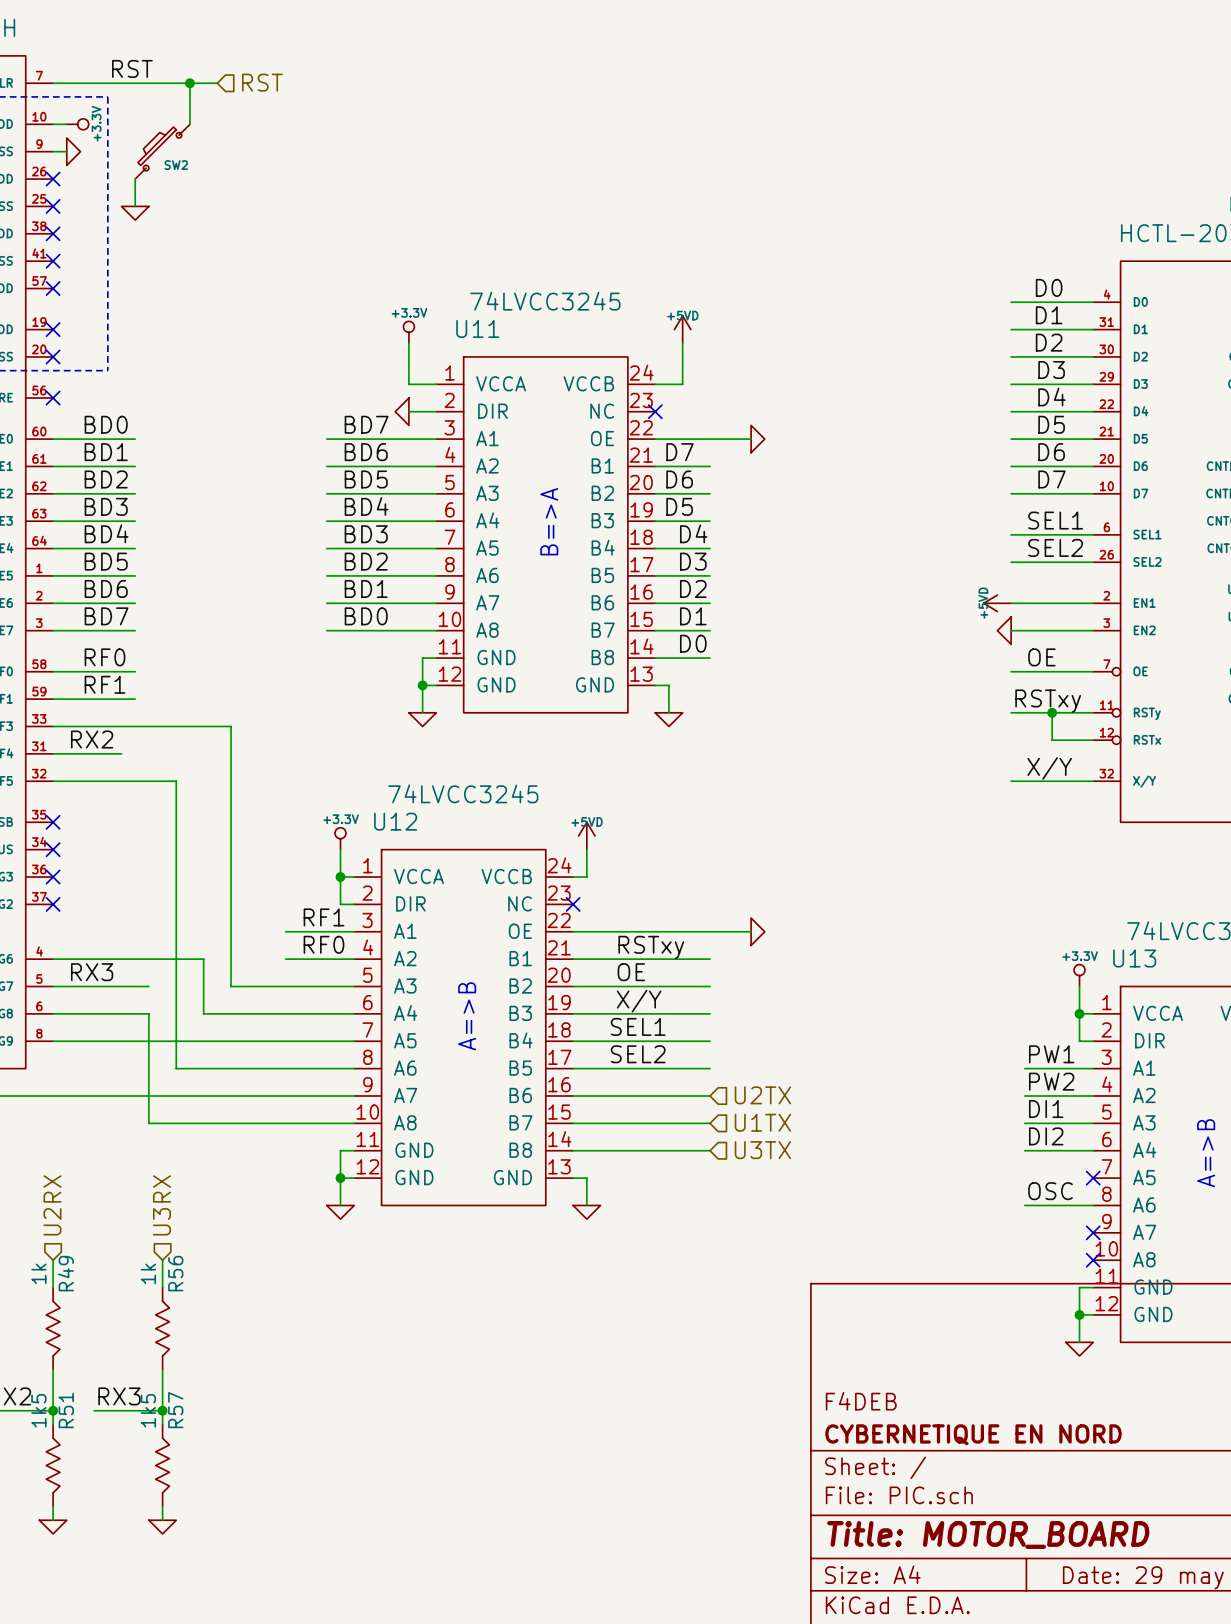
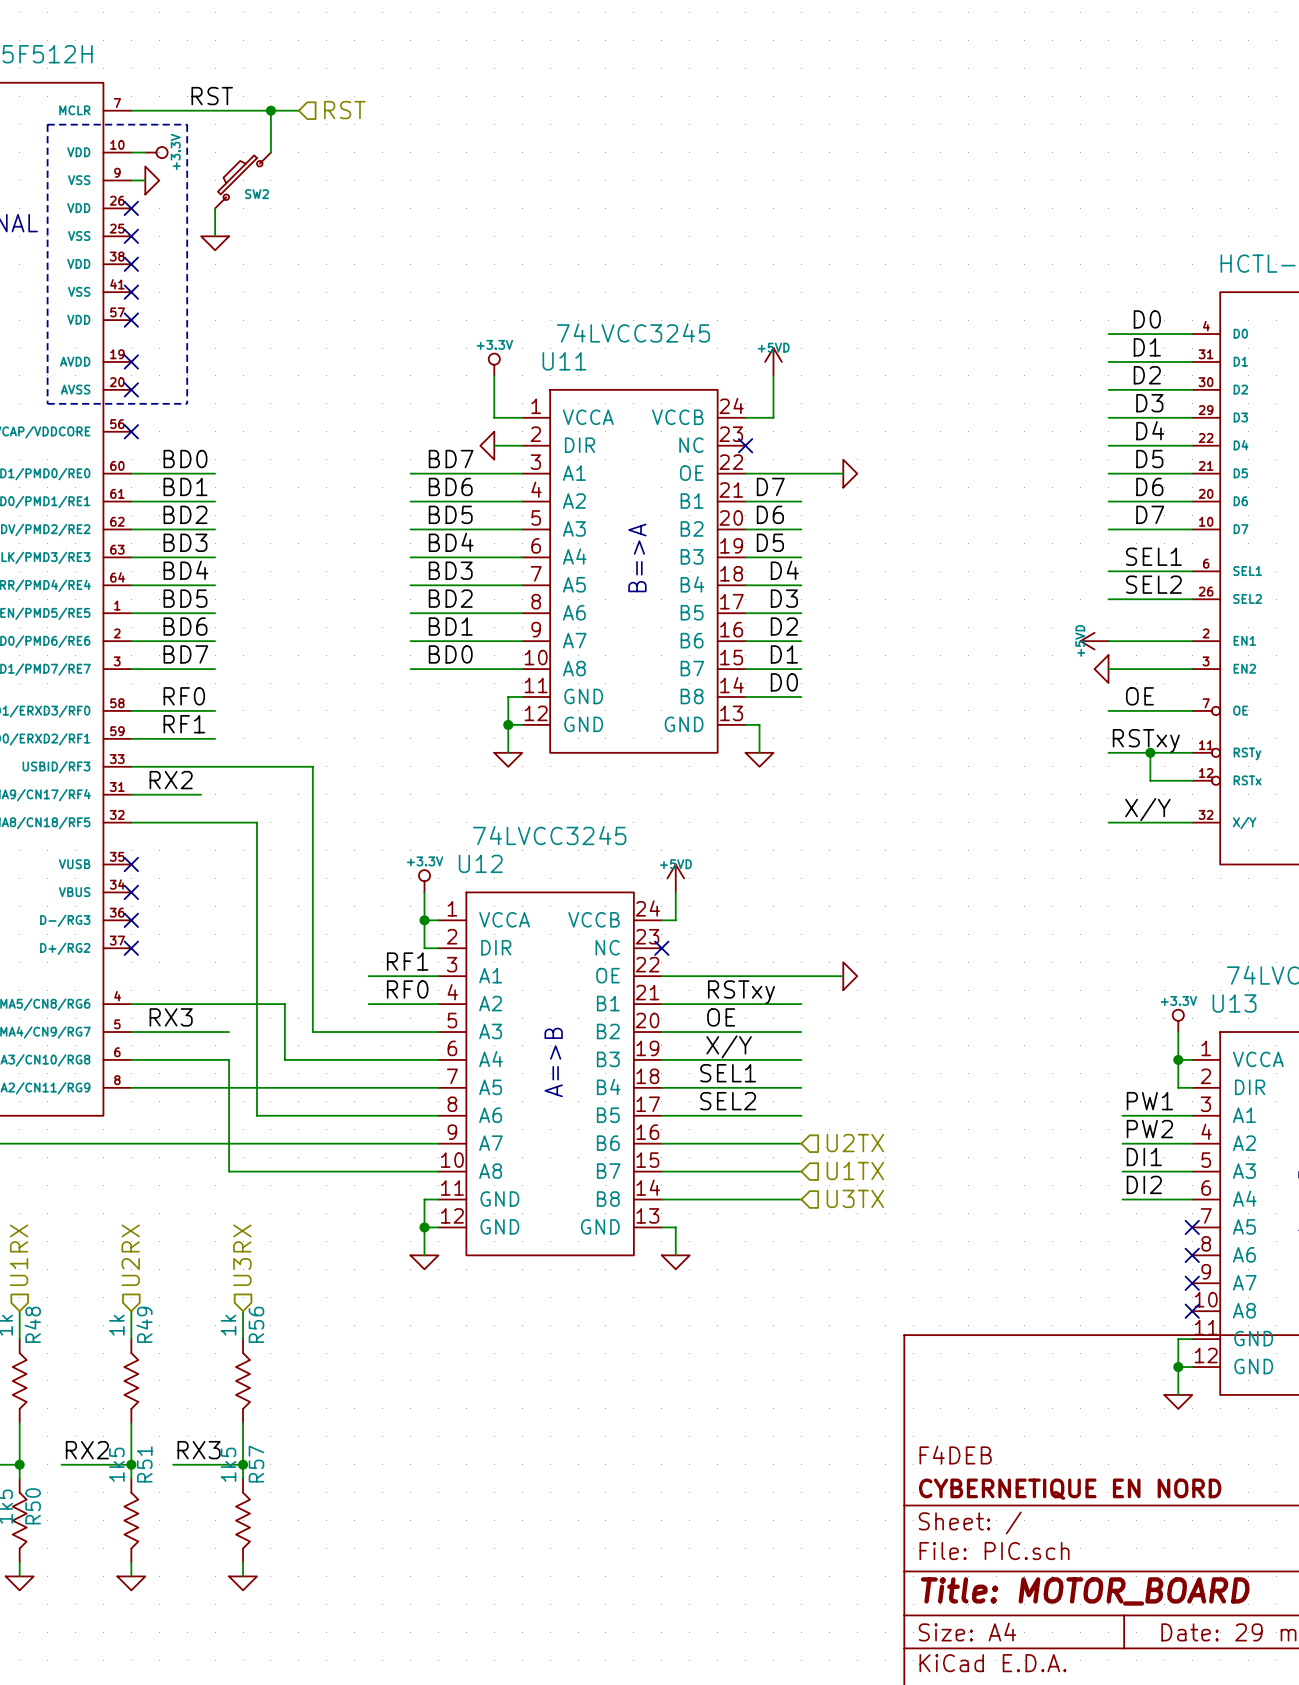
label: OSC (1050, 1191) -> none
wire: (1024, 1205) (1093, 1205) -> none
no-connect mark: none -> (1192, 1255)

